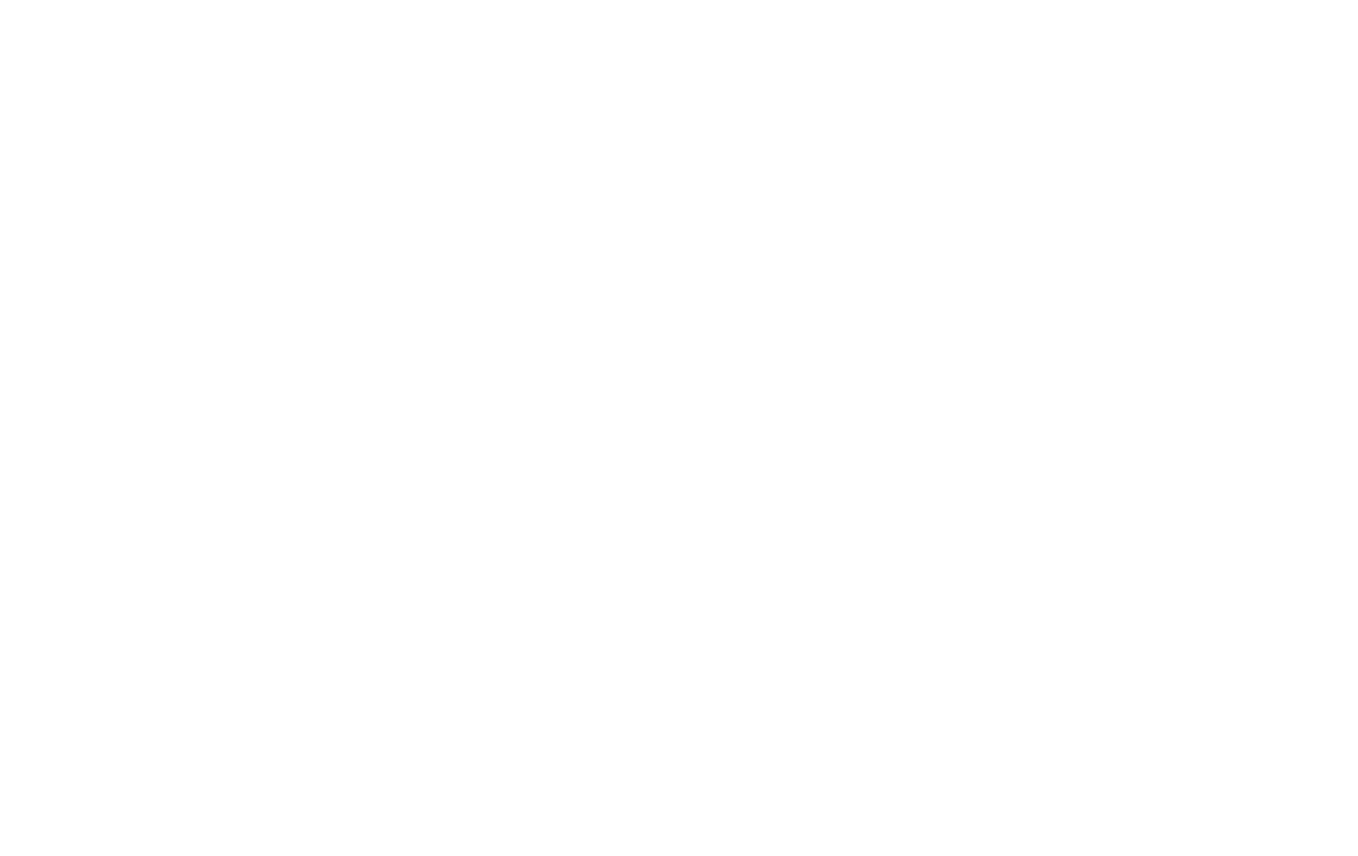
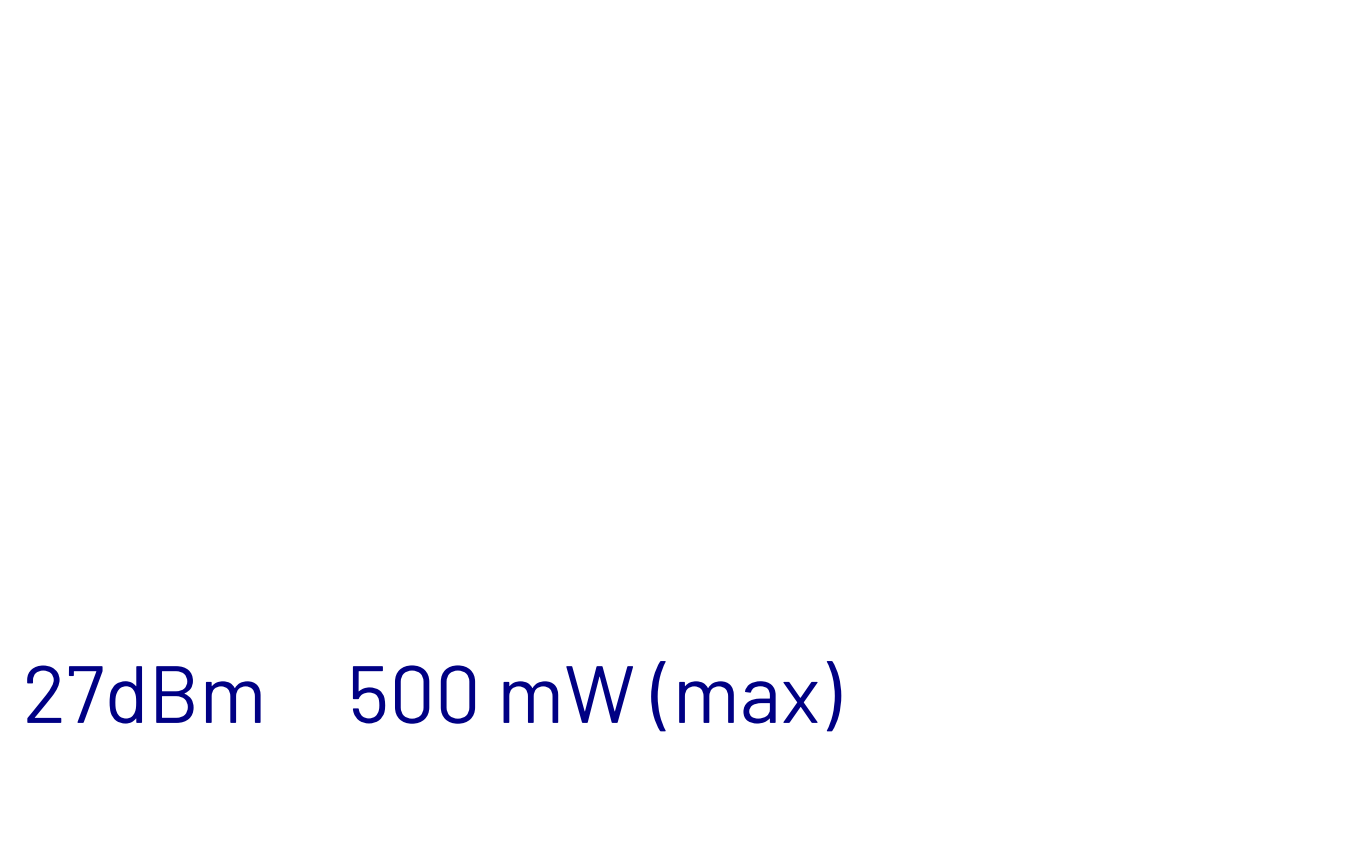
text: none -> 27dBm 500 mW (max) (434, 696)

